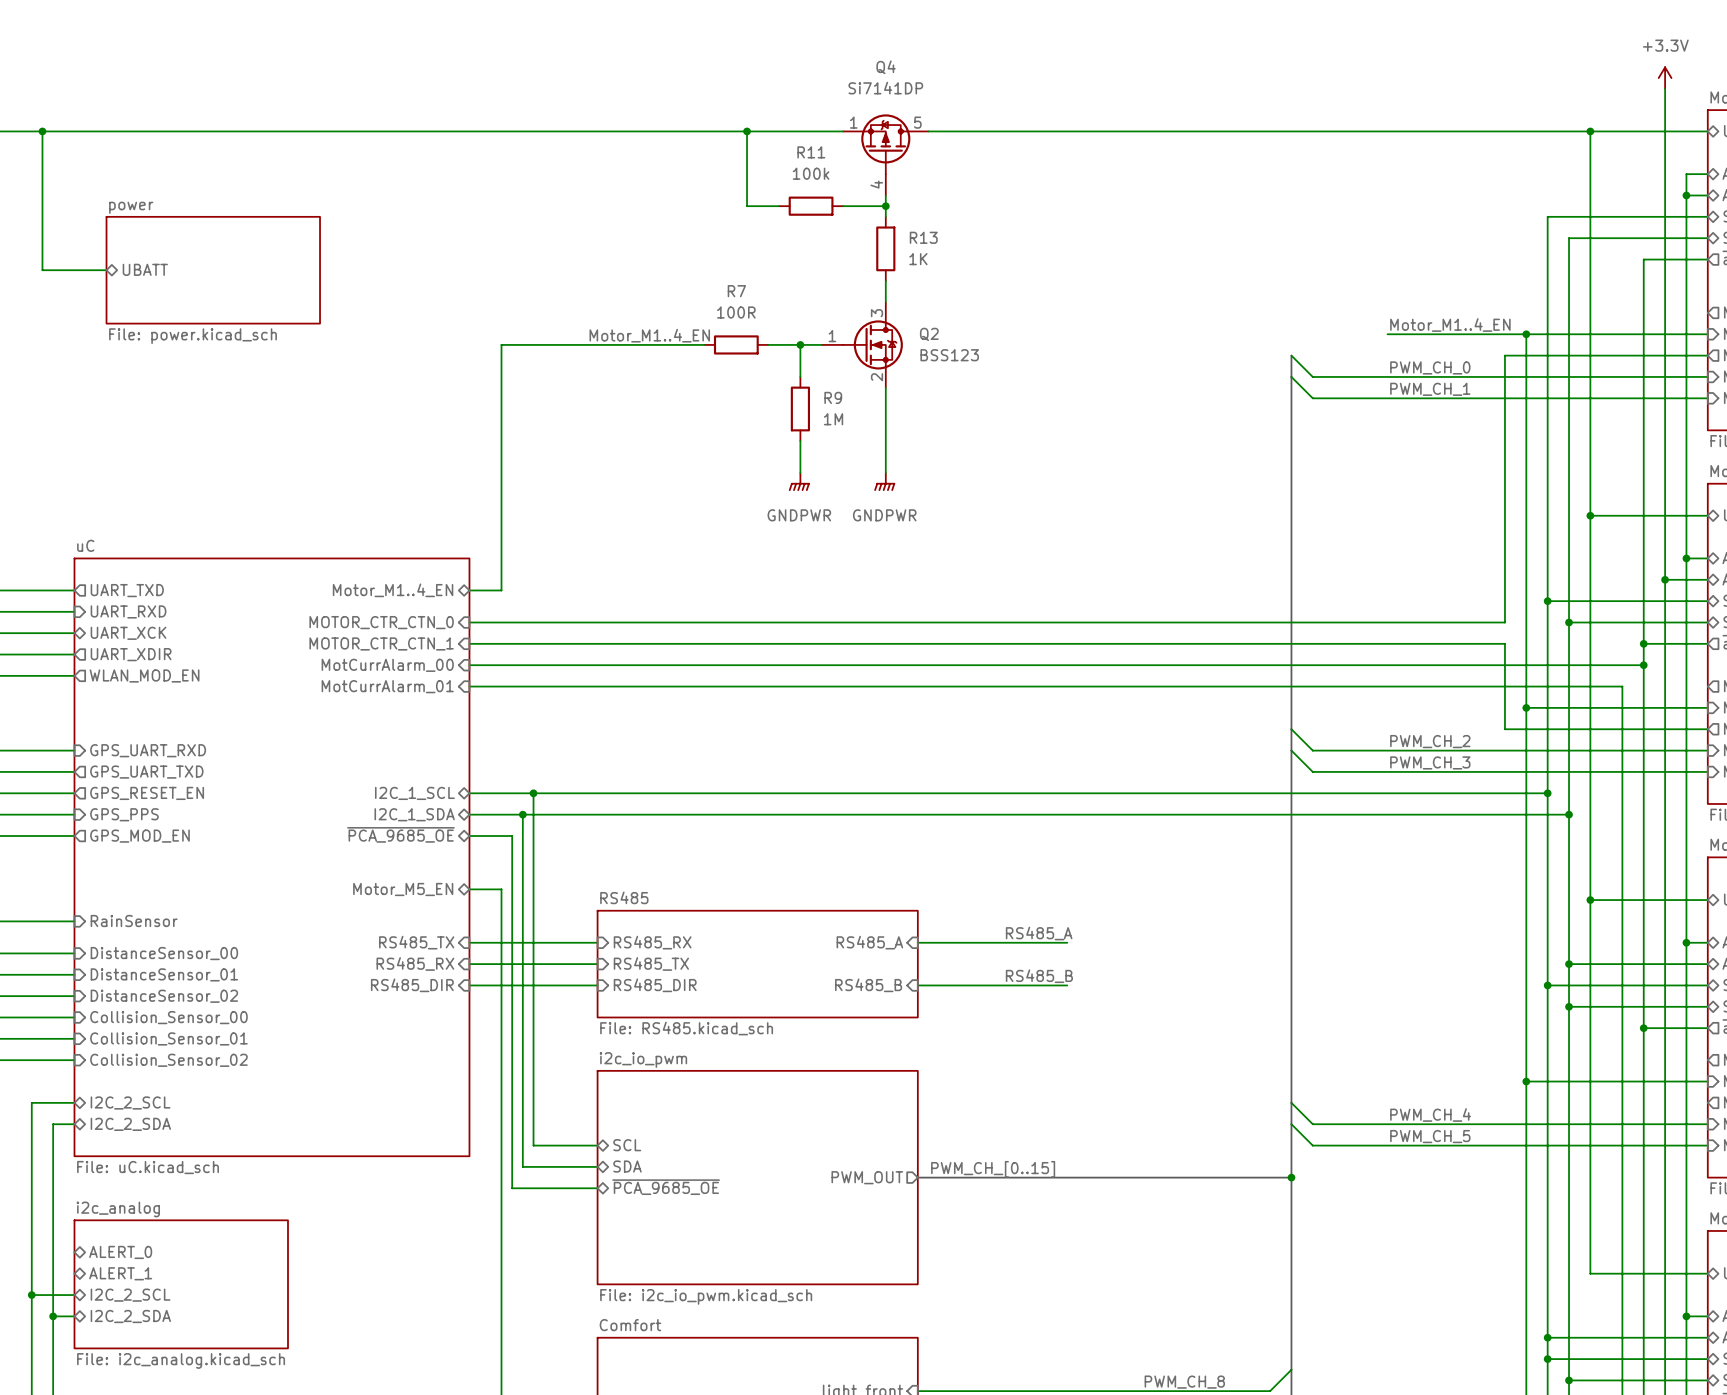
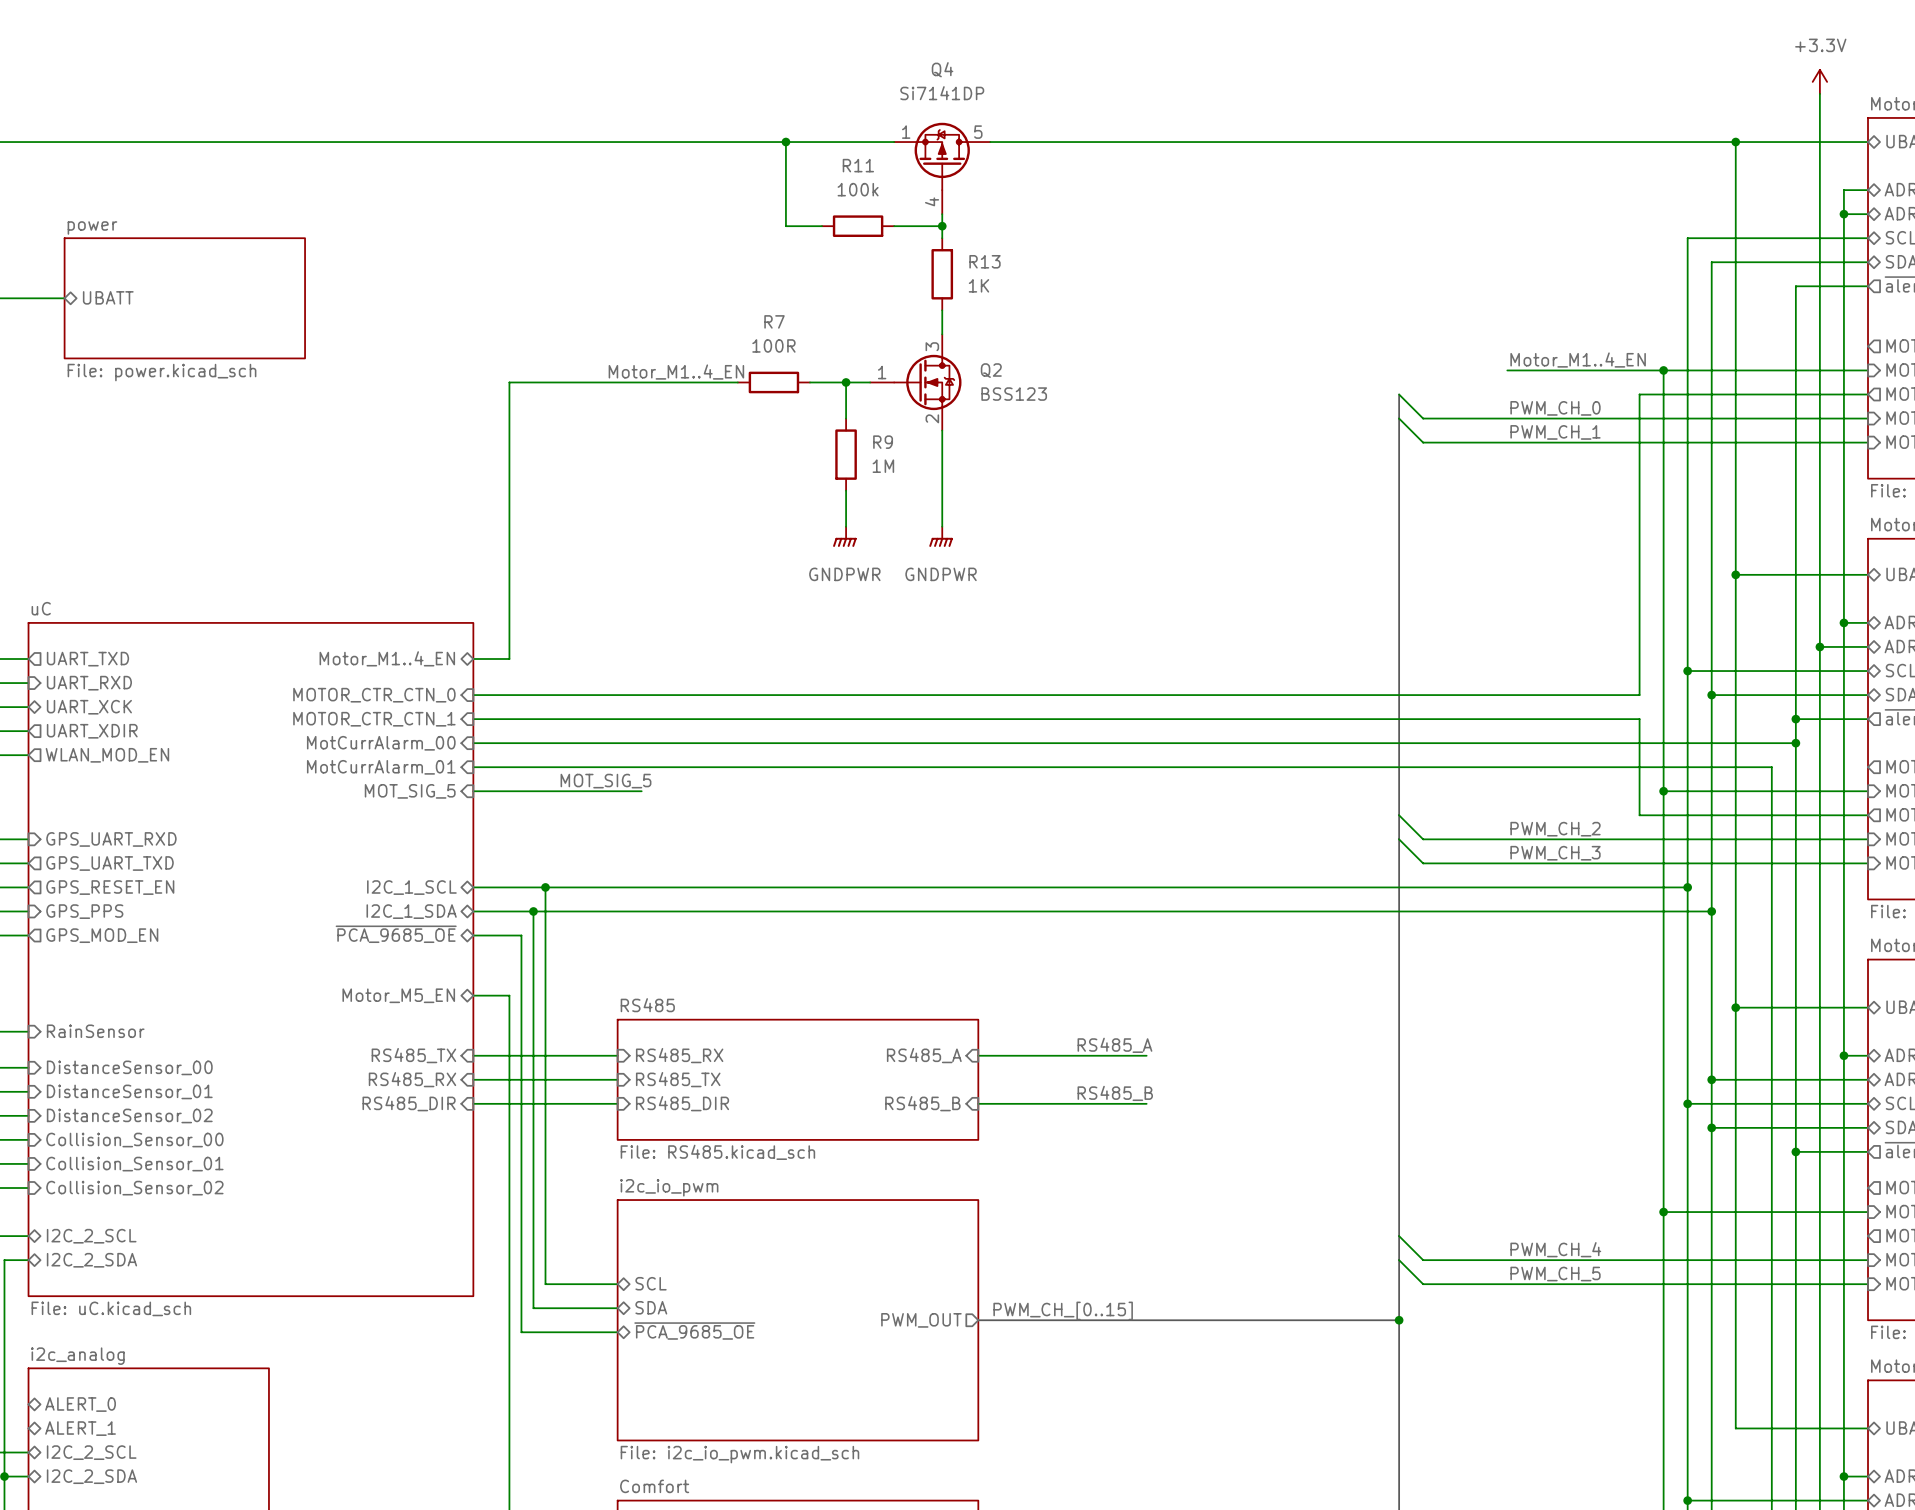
label: none -> MOT_SIG_5 (605, 781)
wire: none -> (473, 791) (641, 791)
sheet pin: none -> MOT_SIG_5 (410, 791)

